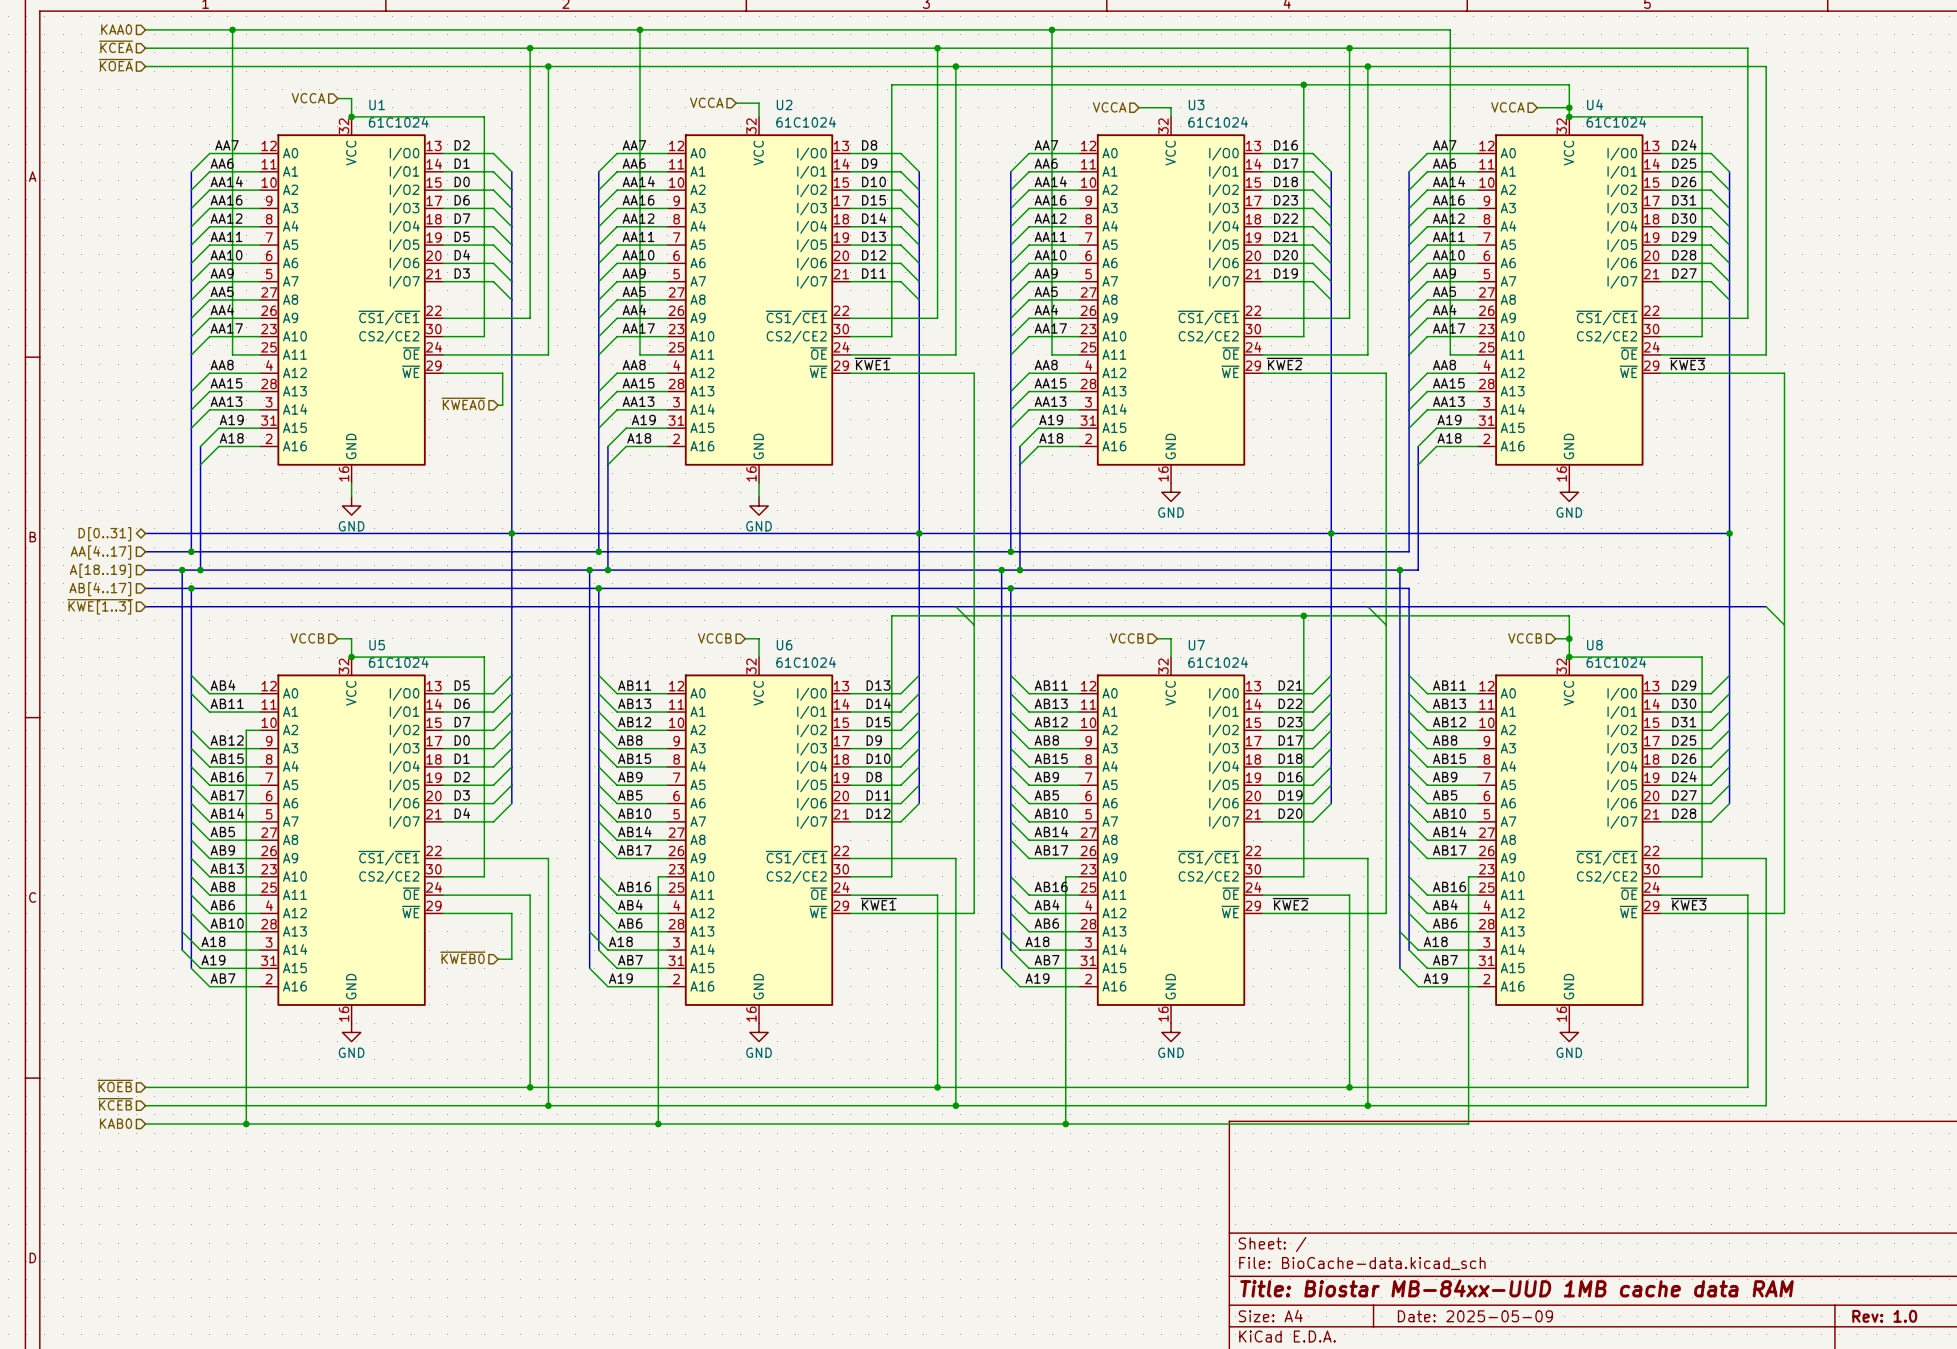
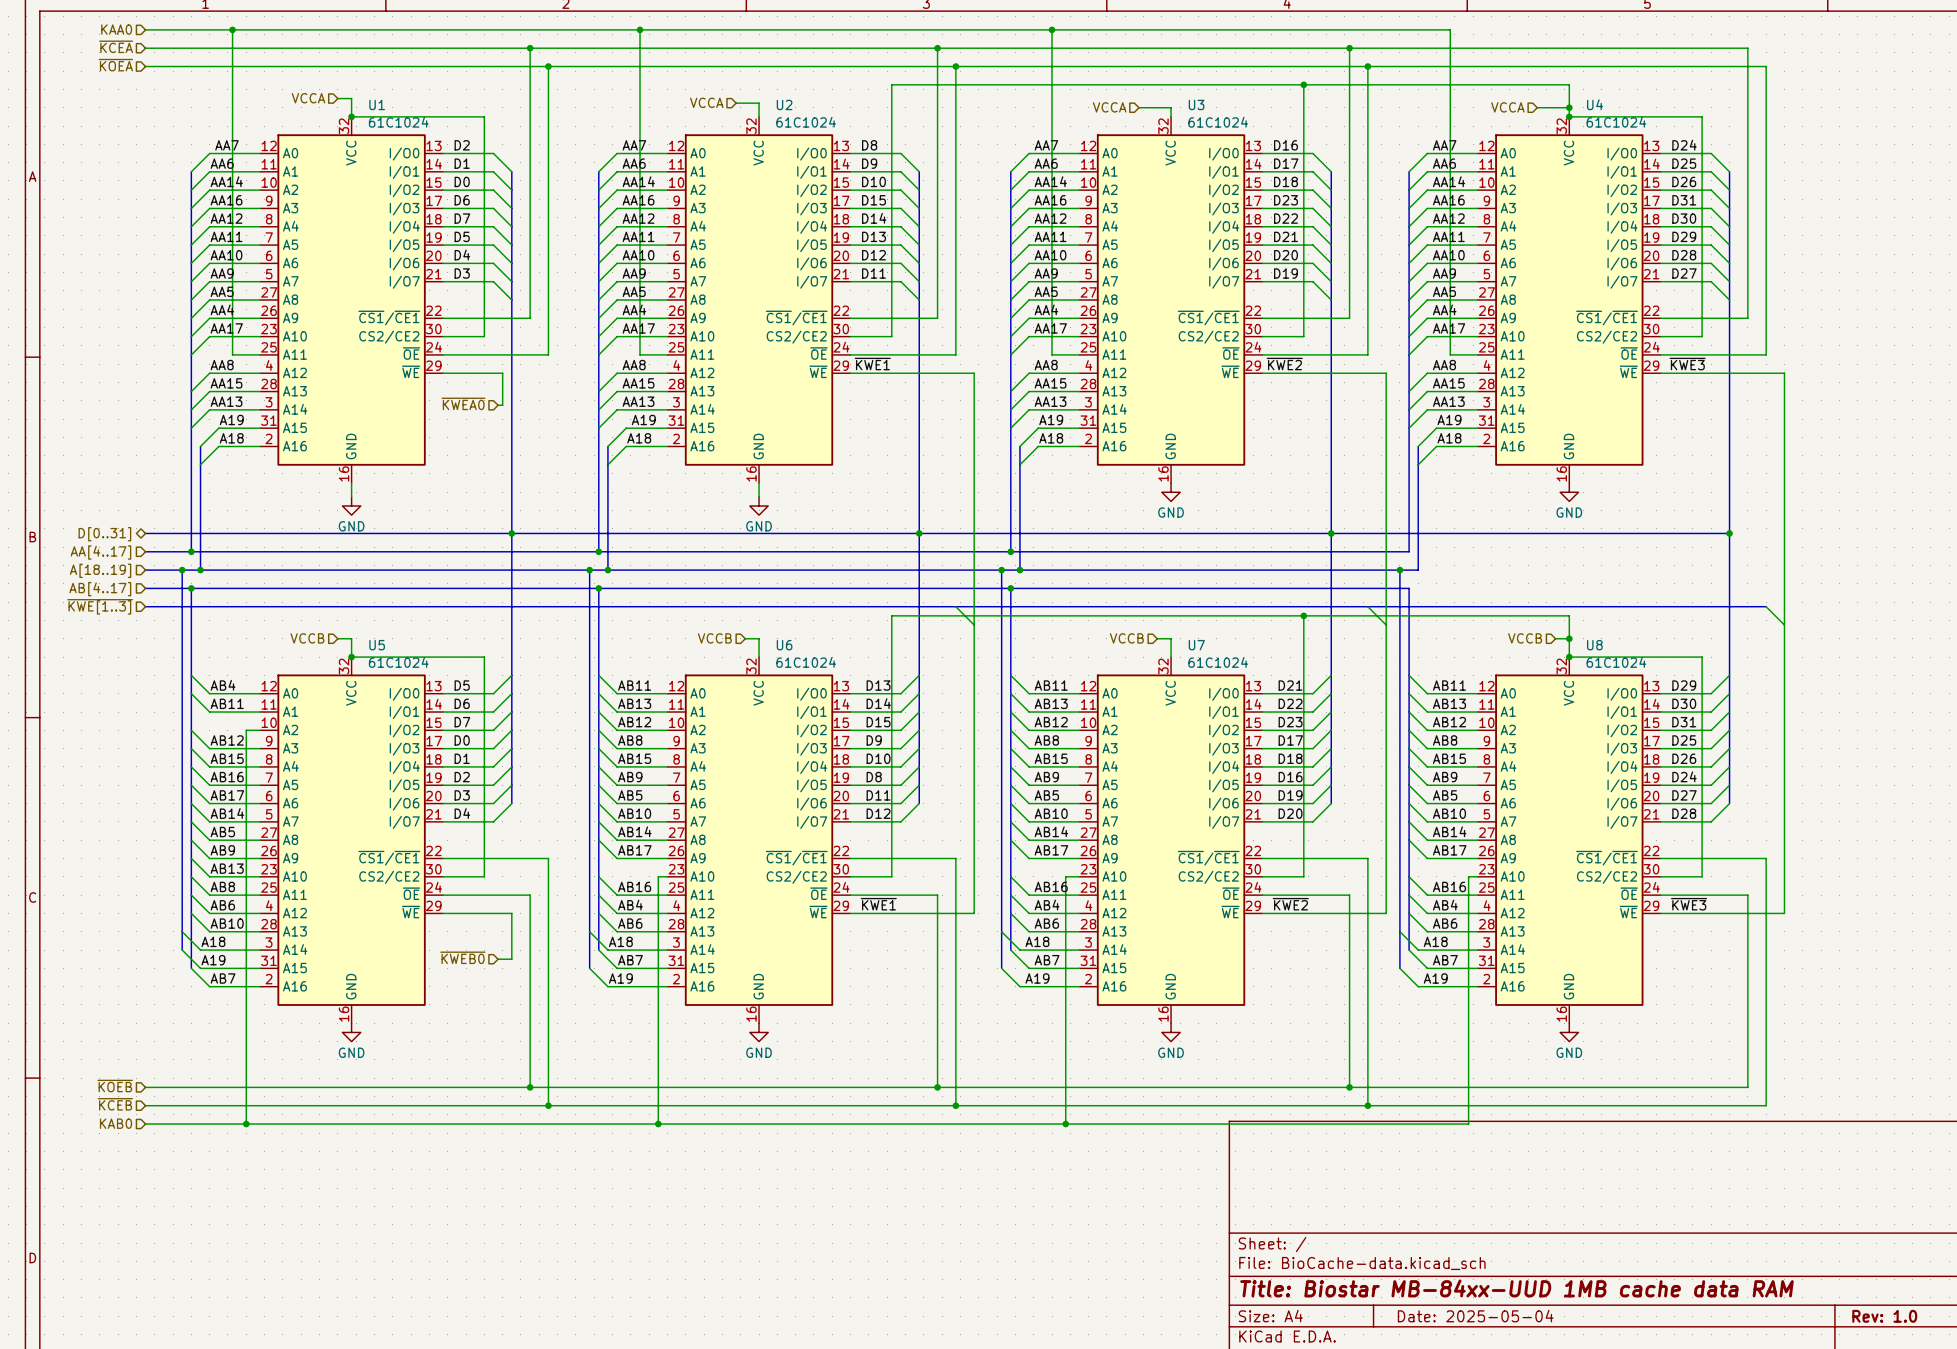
title block: Date: 2025-05-09 (1475, 1316) -> Date: 2025-05-04 (1475, 1316)

